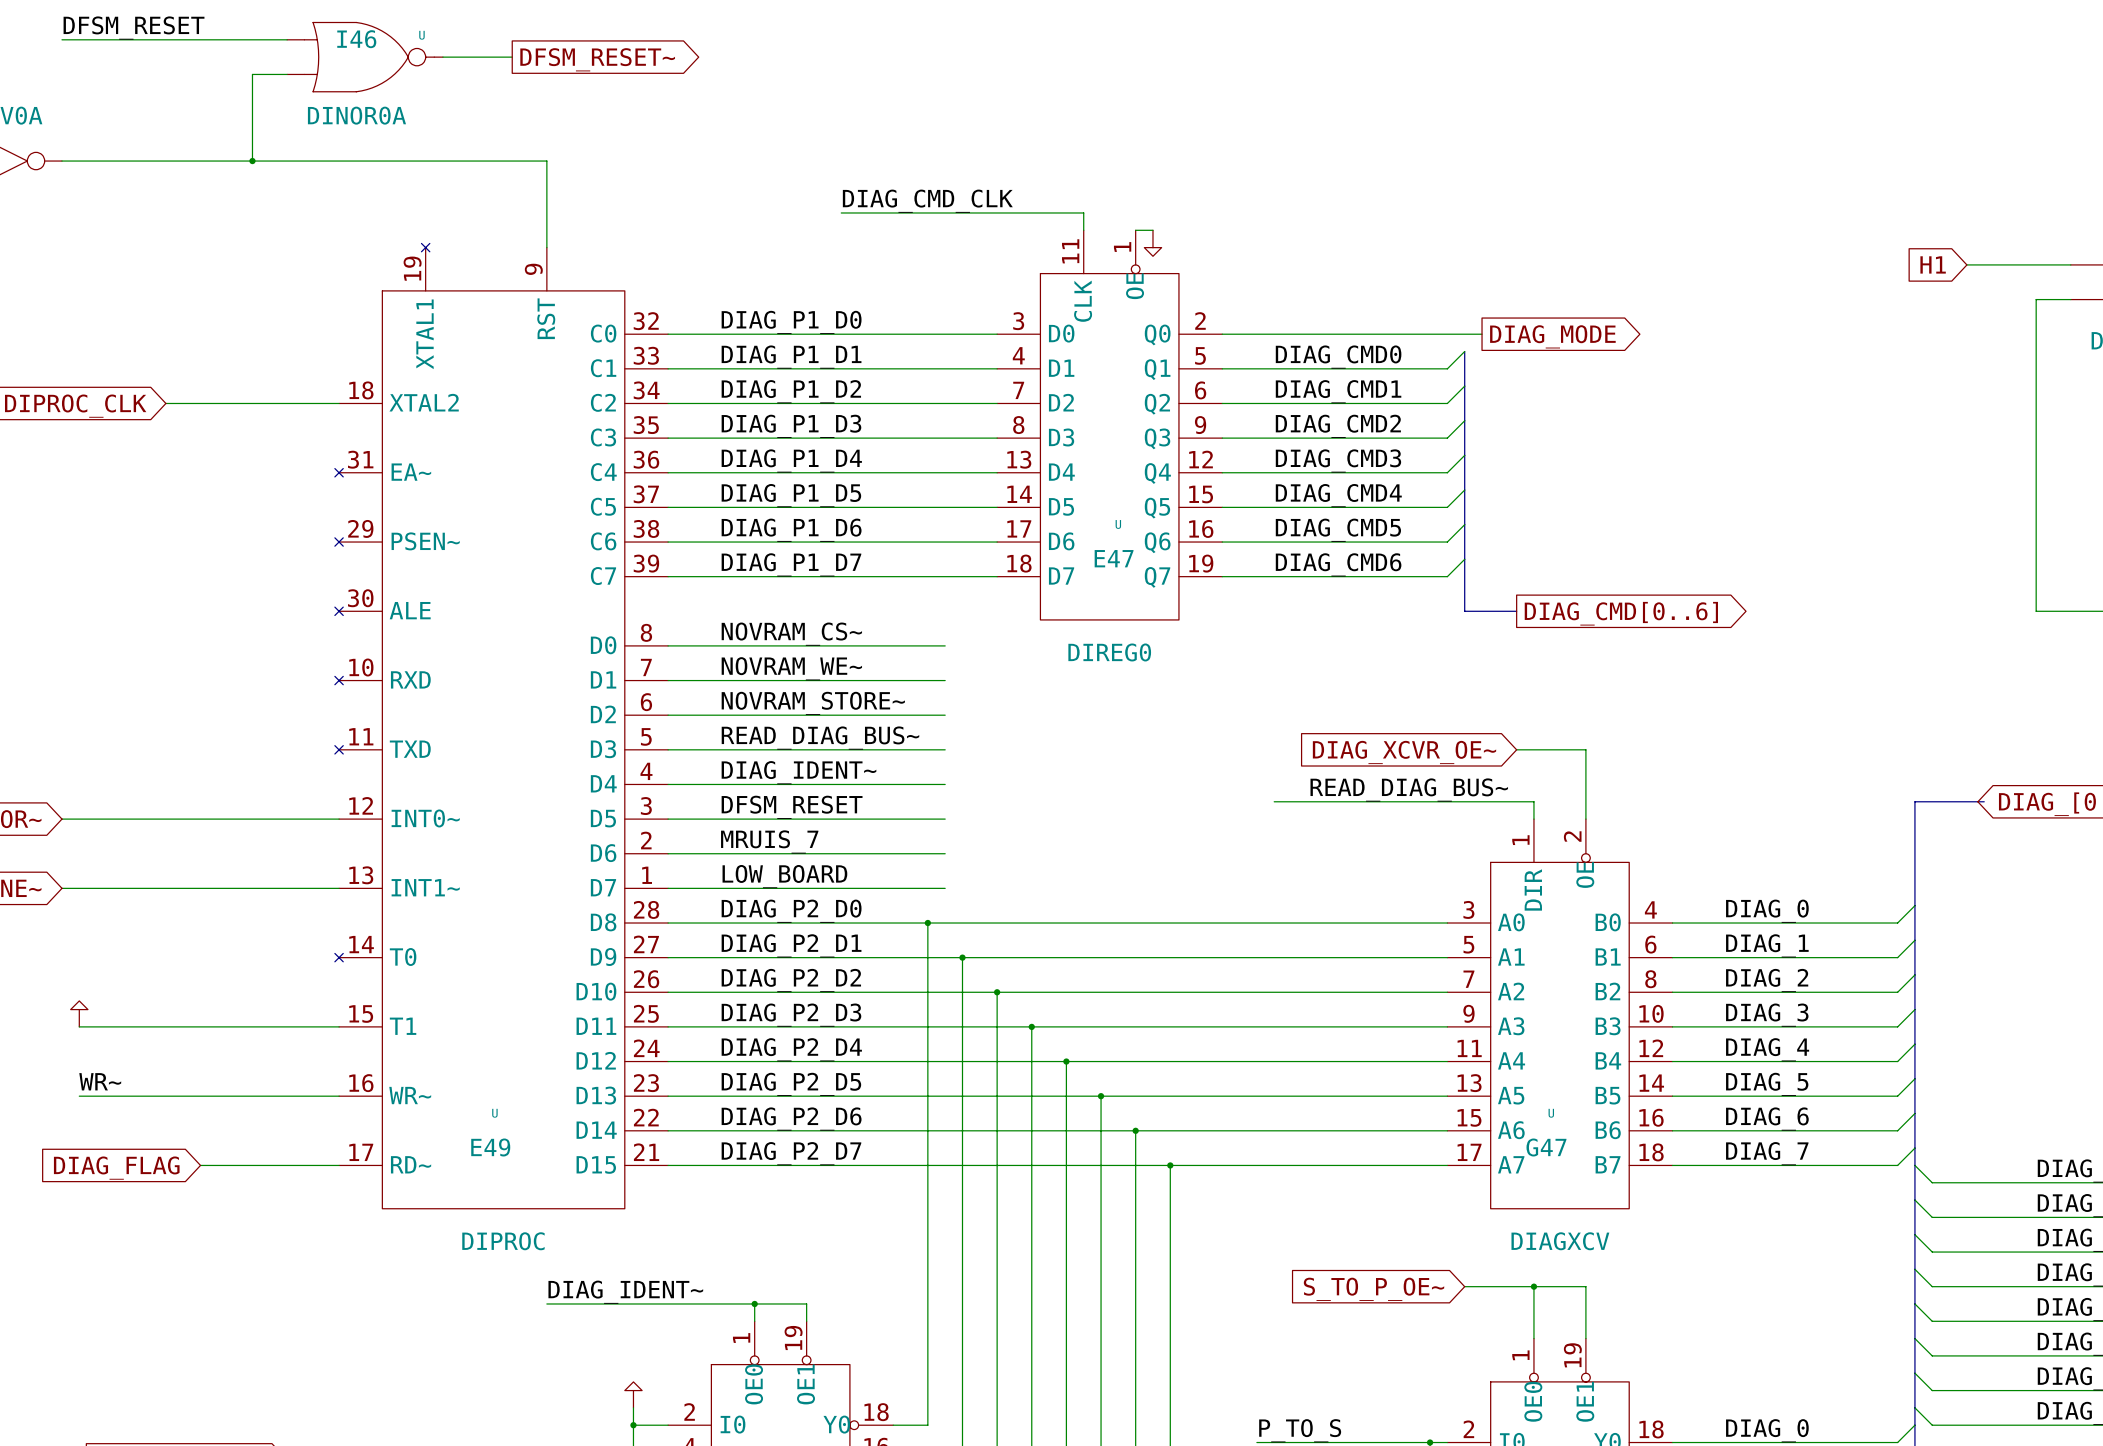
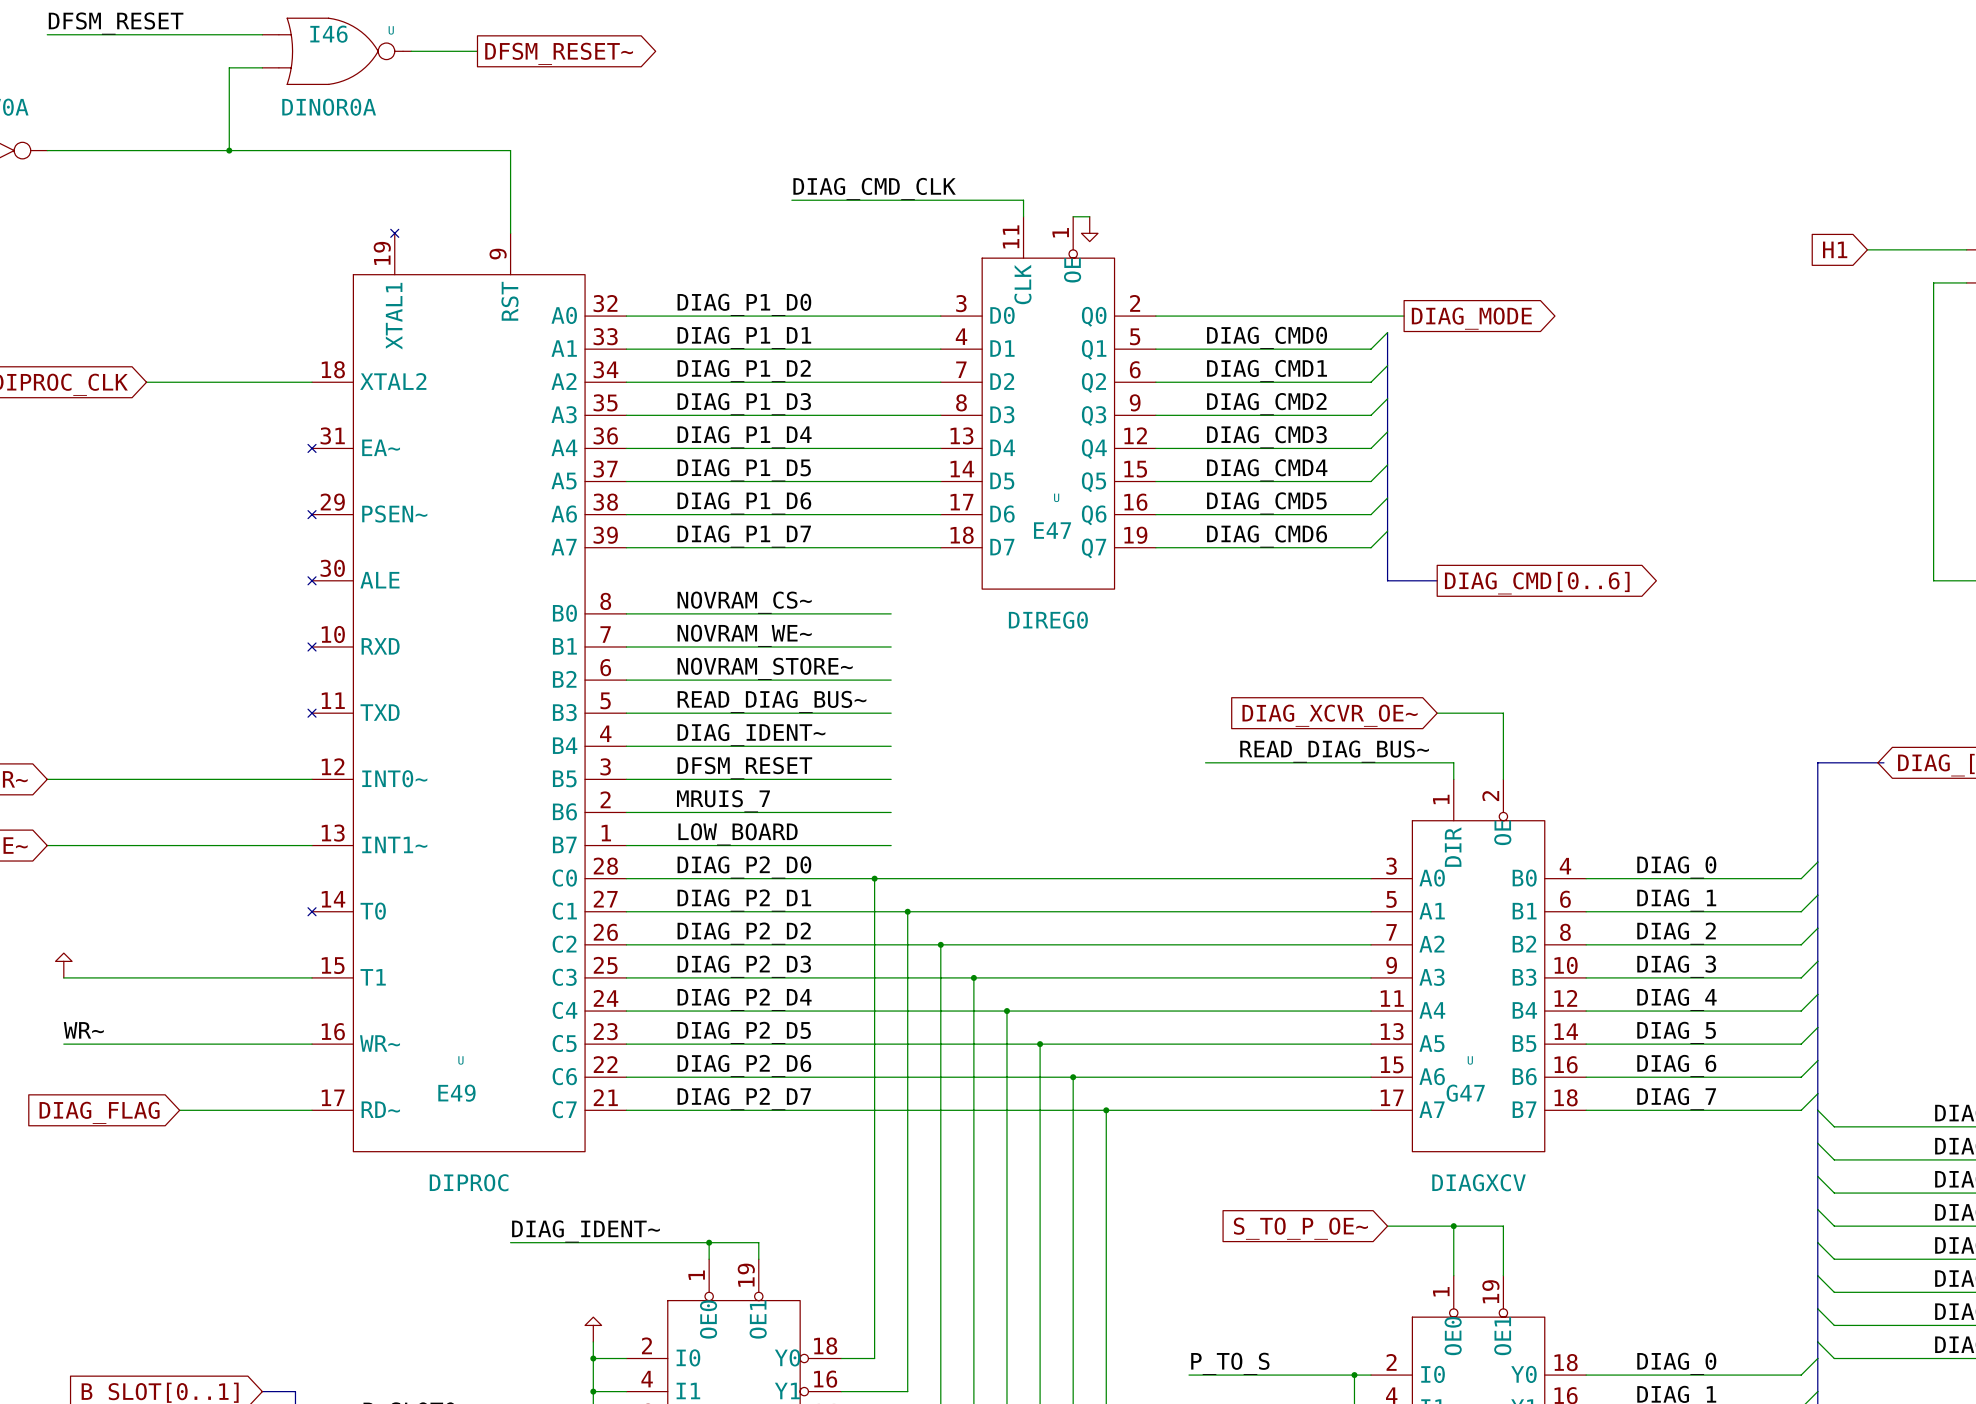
U symbol: [339, 247, 669, 1209] -> [312, 233, 627, 1152]

